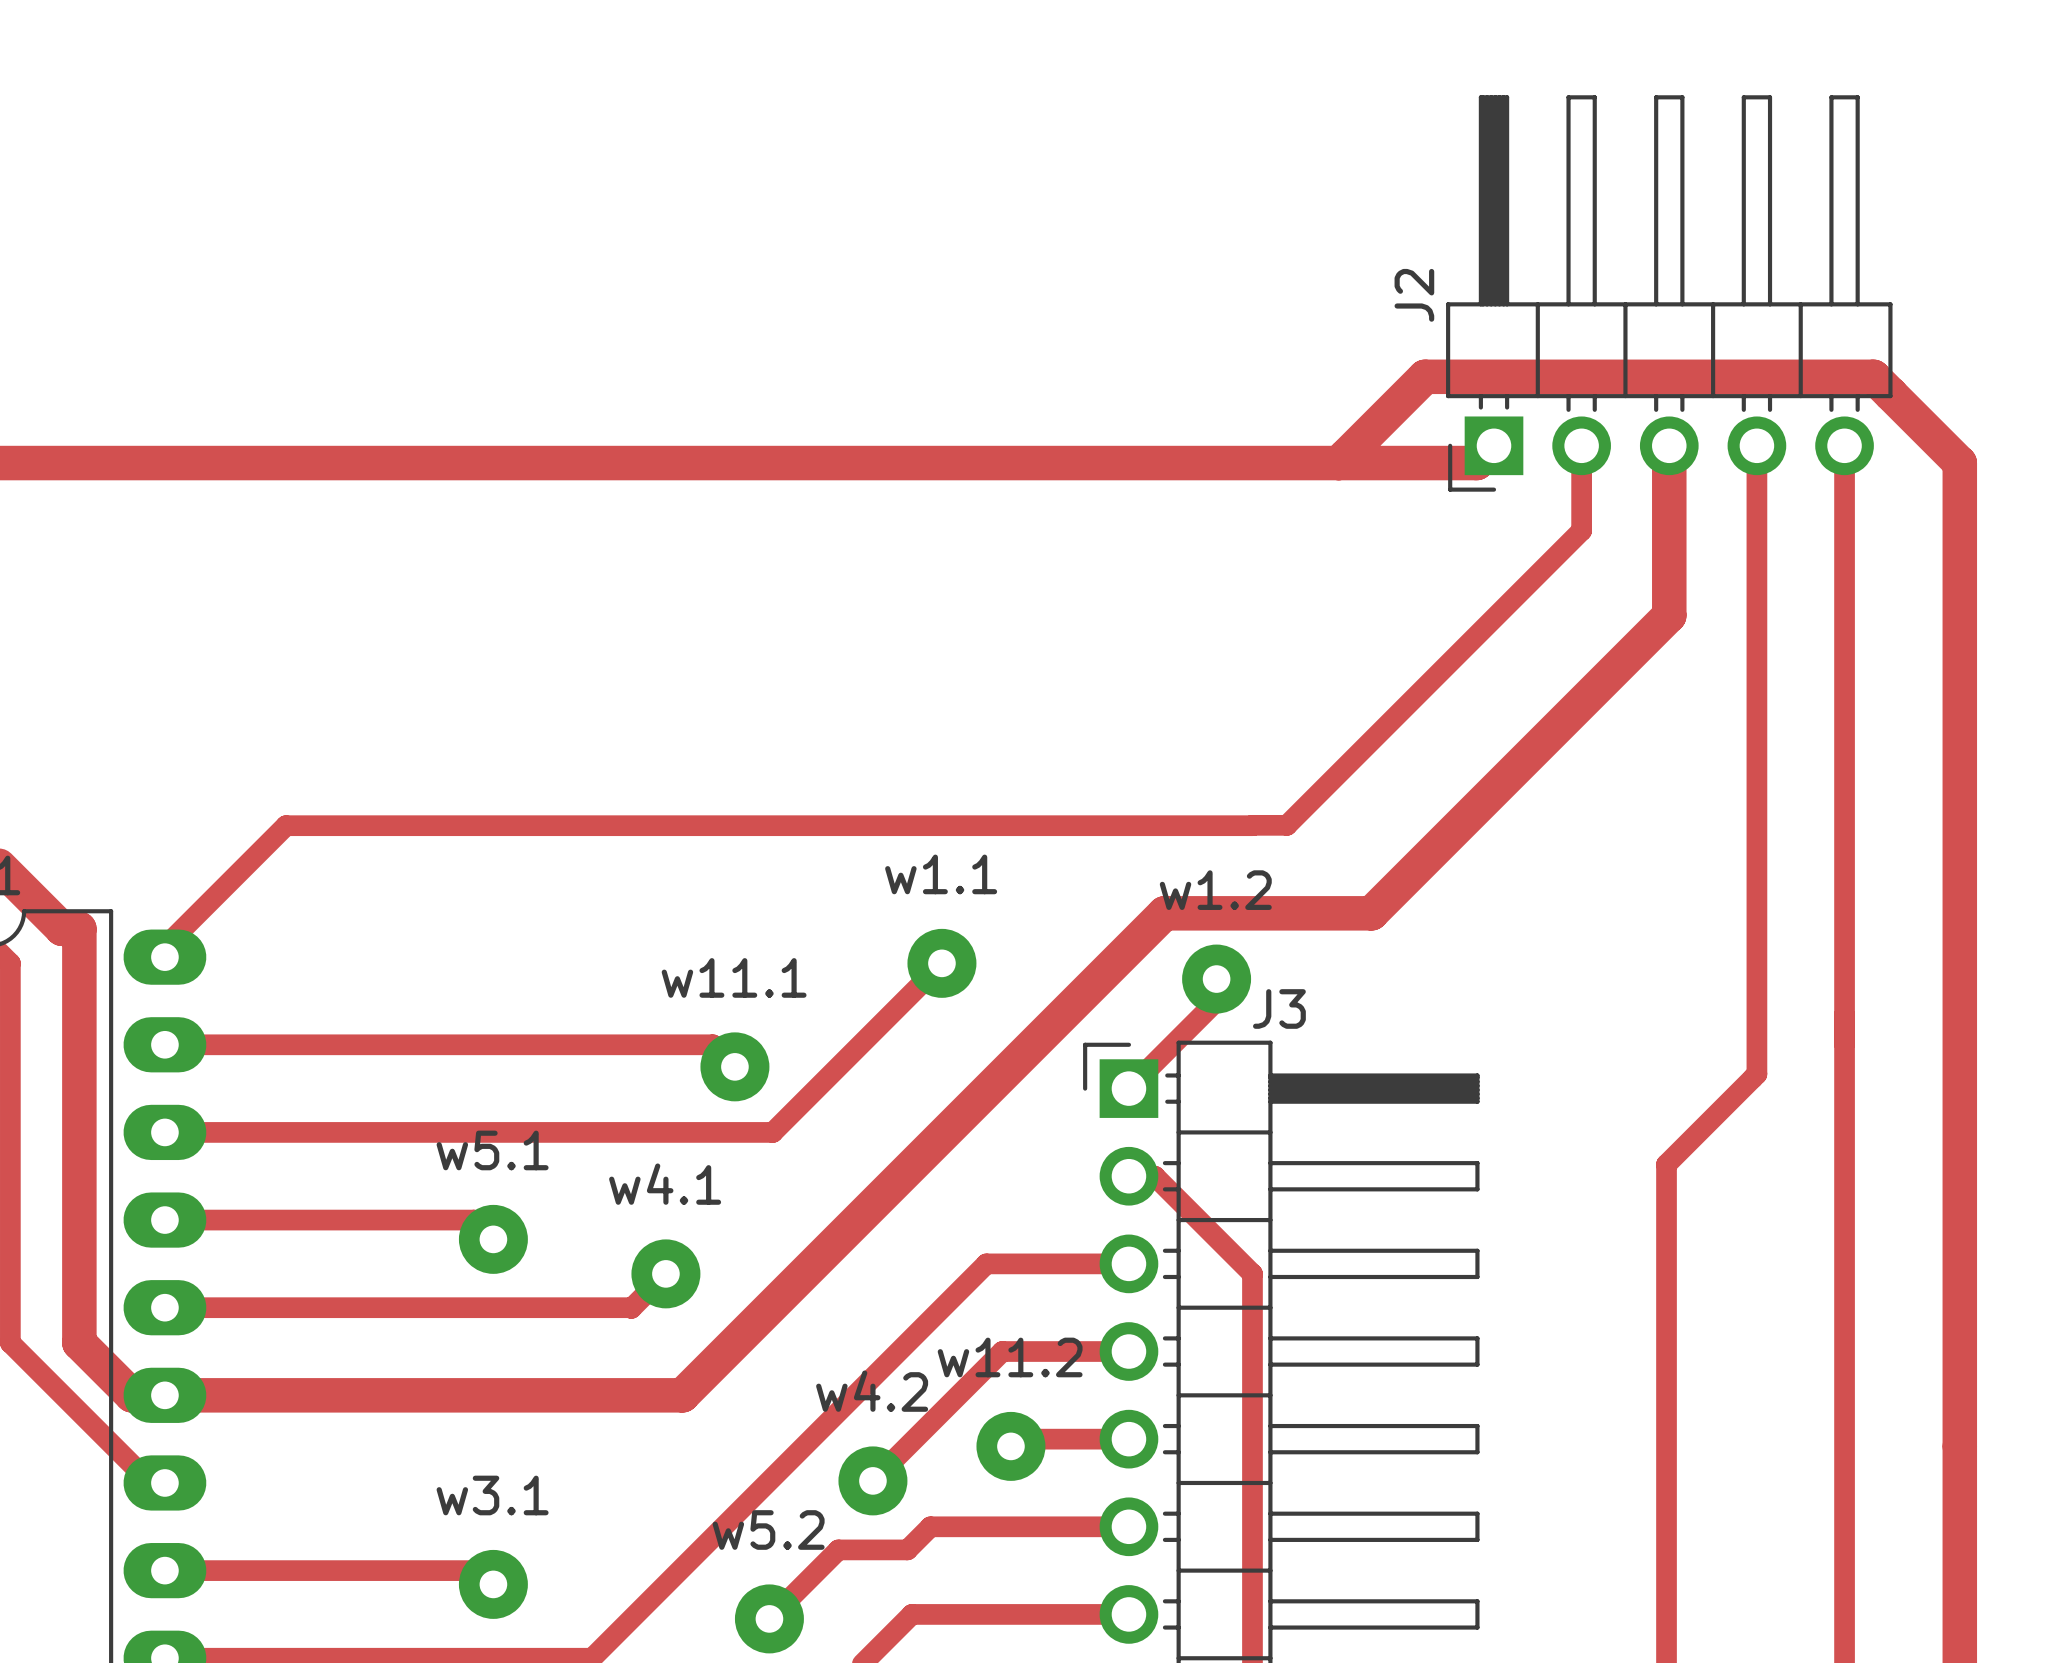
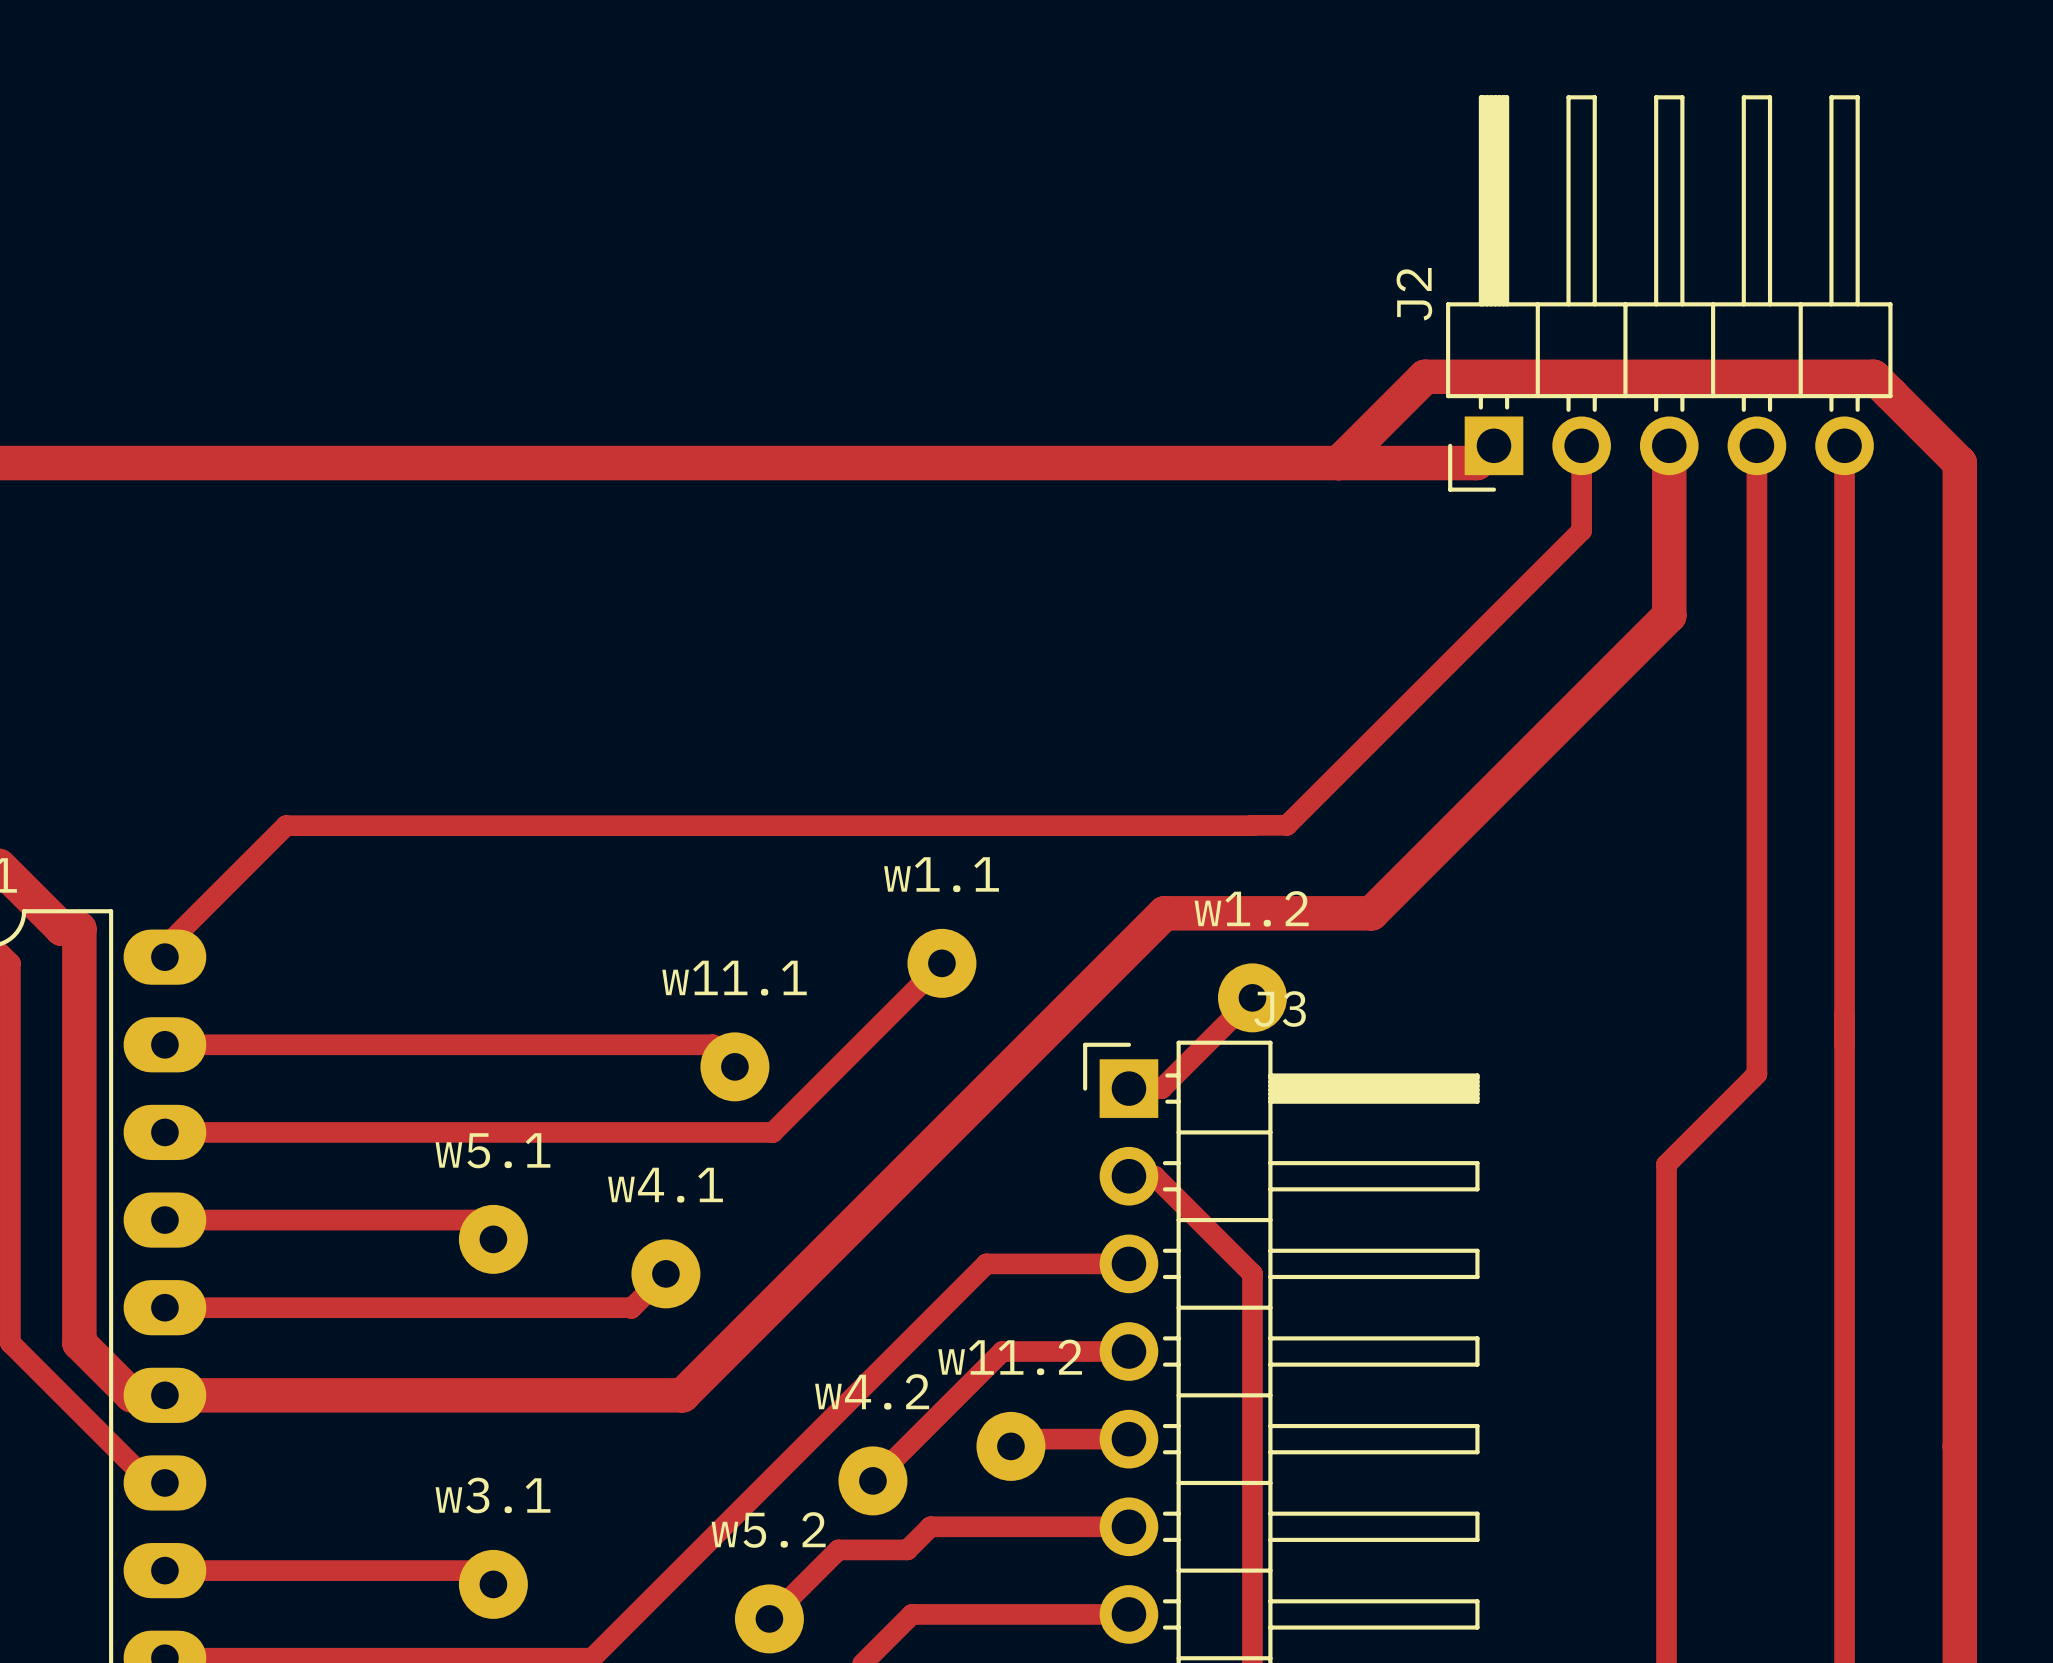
w1.2 position: (1216, 979) -> (1252, 997)
track: (1219, 997) (1128, 1088) -> (1252, 997) (1161, 1088) (1128, 1088)

